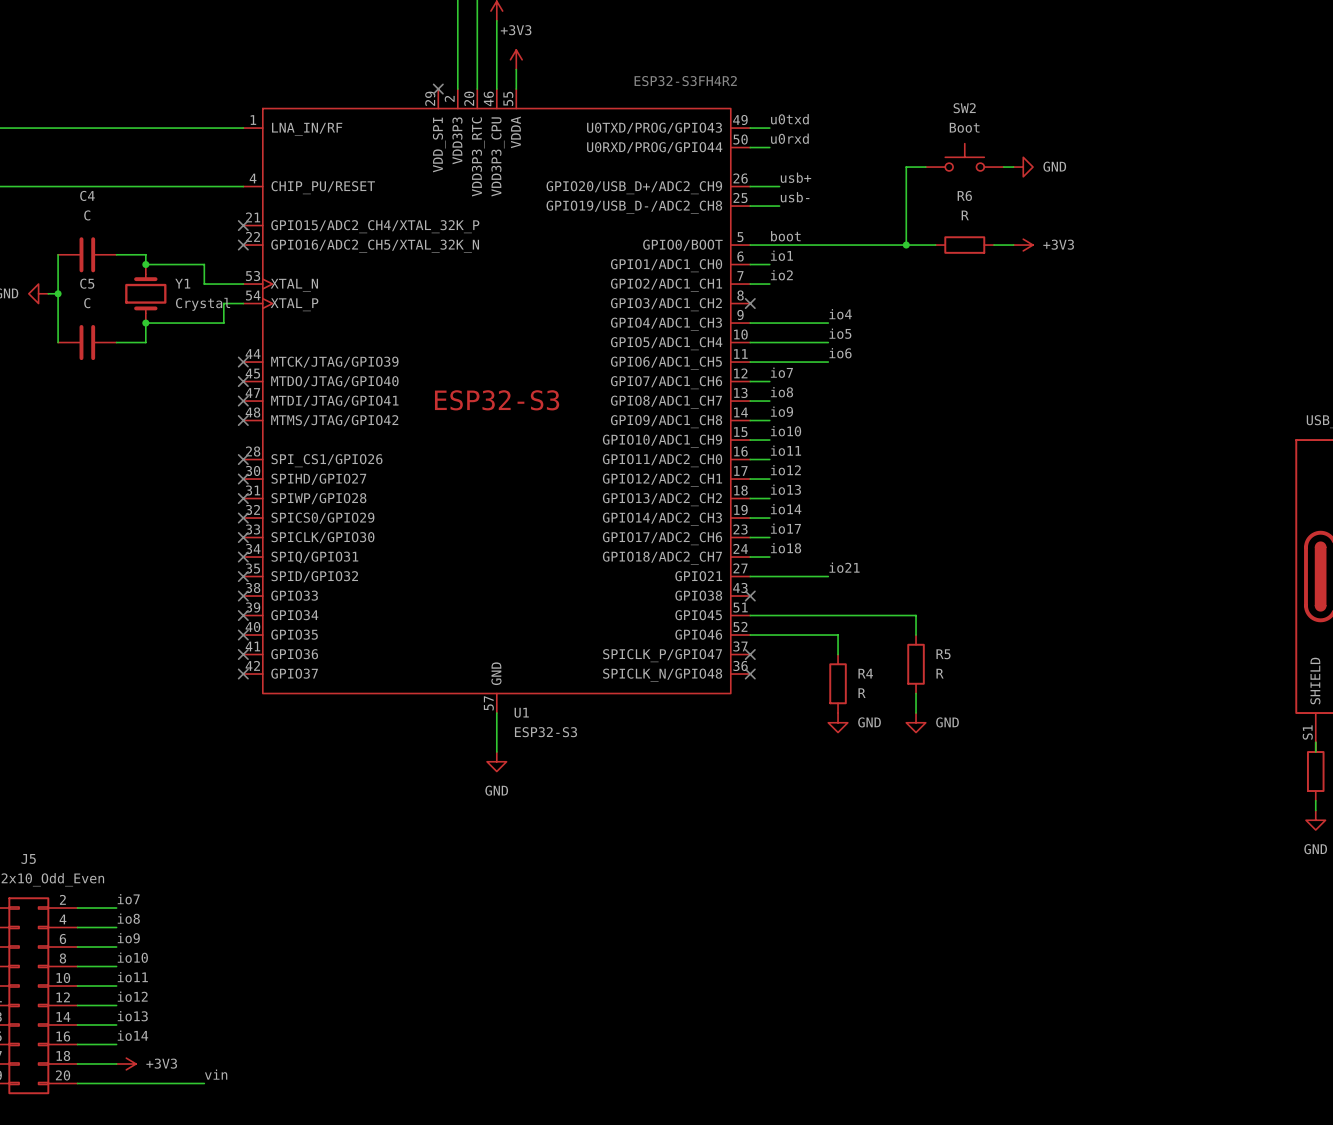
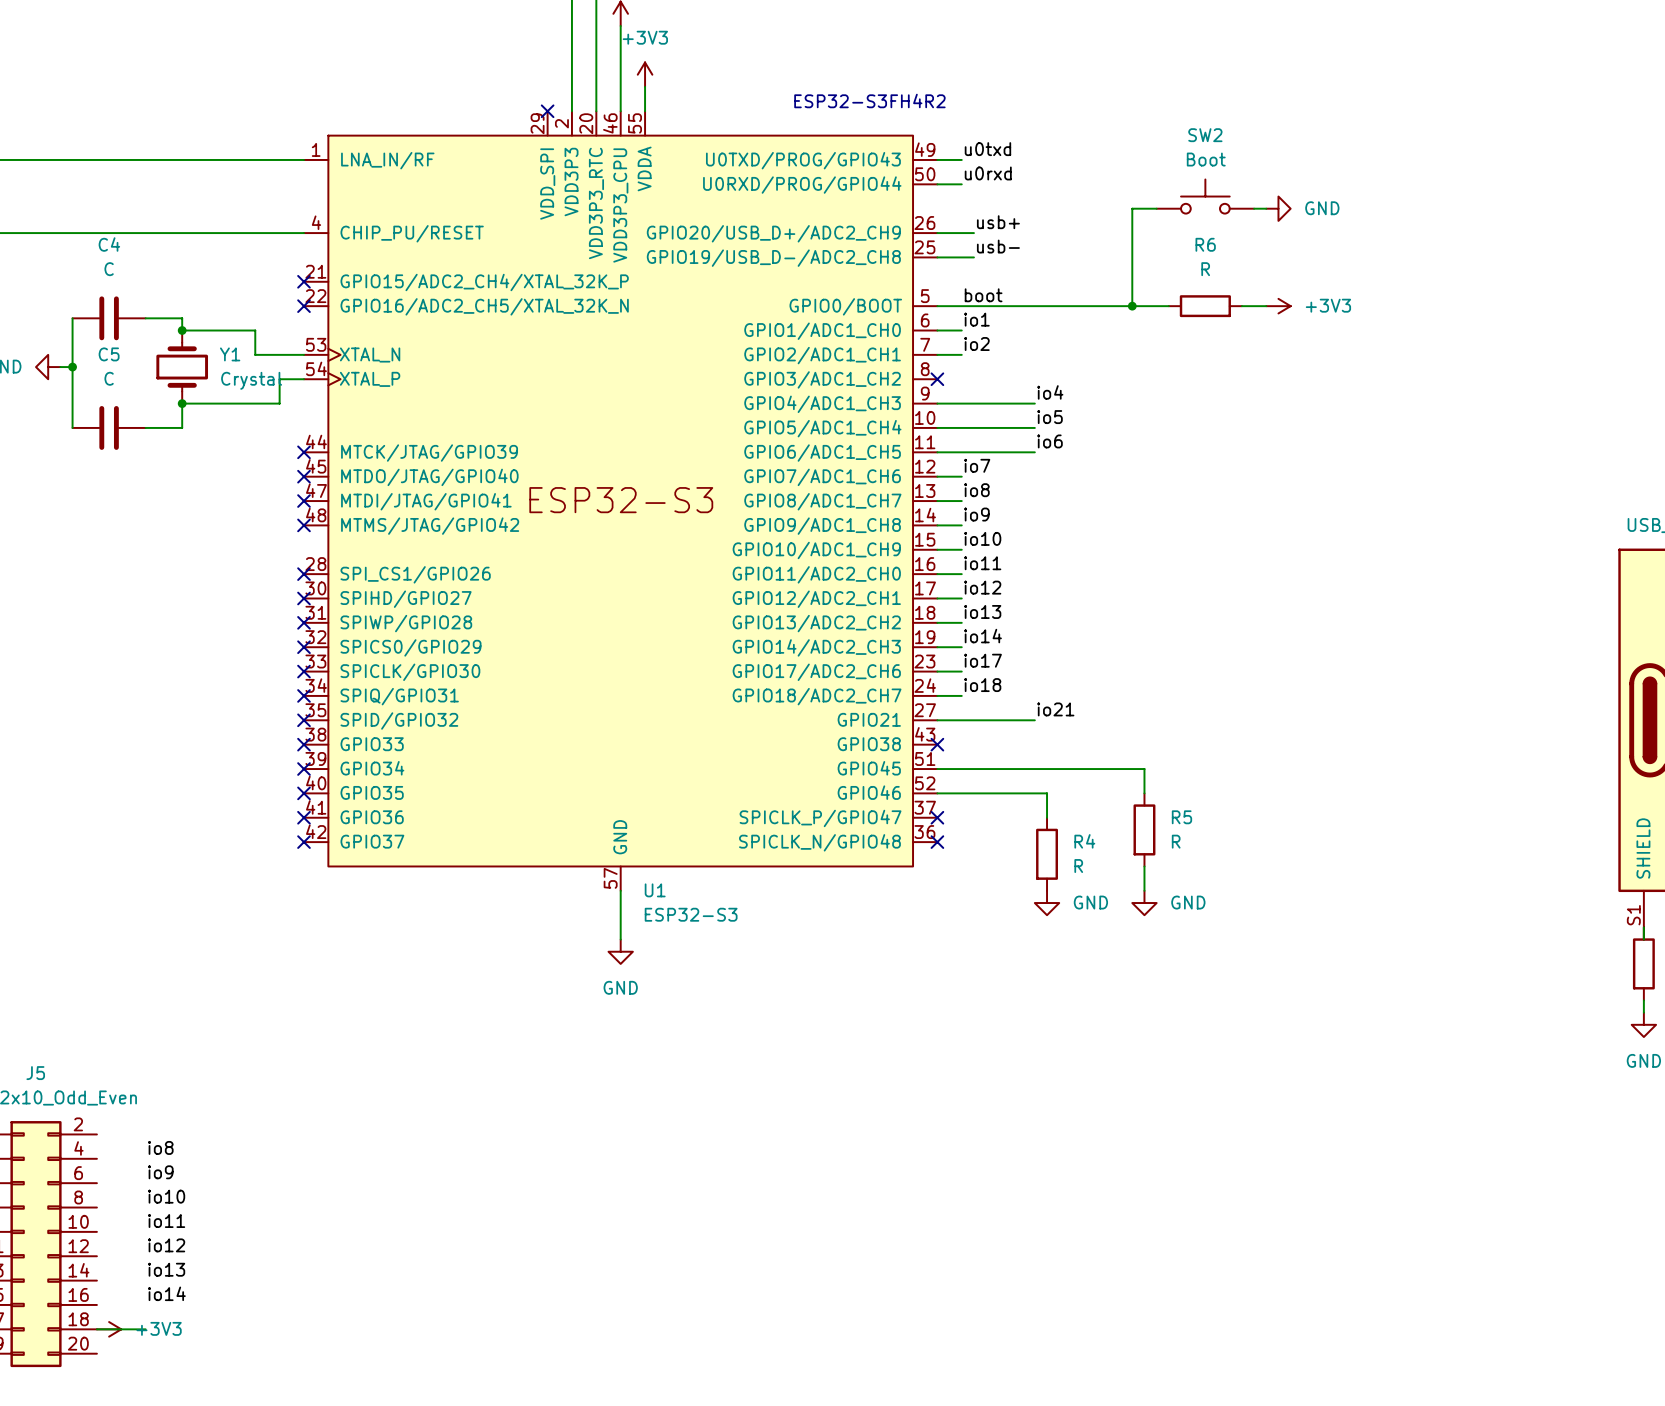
label: io7 (128, 899) -> none
wire: (77, 908) (116, 908) -> none
wire: (77, 927) (116, 927) -> none
wire: (77, 947) (116, 947) -> none
wire: (77, 966) (116, 966) -> none
wire: (77, 986) (116, 986) -> none
wire: (77, 1005) (116, 1005) -> none
wire: (77, 1025) (116, 1025) -> none
wire: (77, 1044) (116, 1044) -> none
power symbol position: +3V3 (126, 1063) -> +3V3 (109, 1329)
label: vin (216, 1074) -> none
wire: (77, 1083) (204, 1083) -> none

